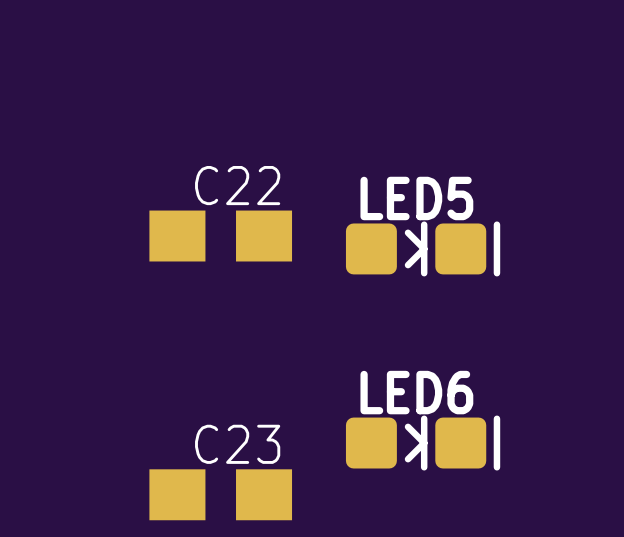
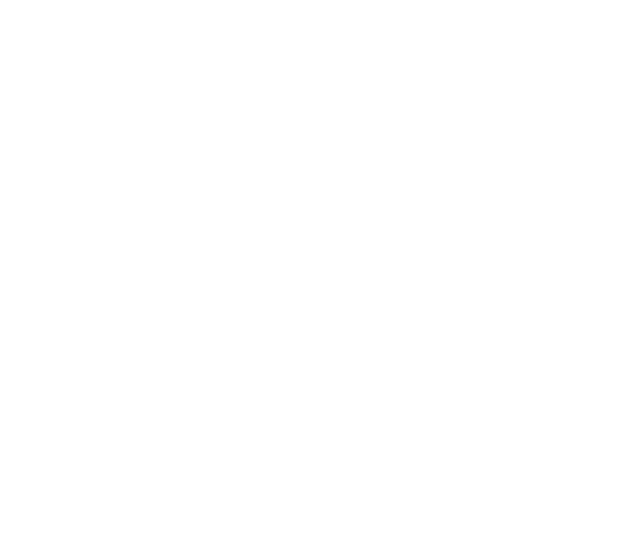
C22: (220, 236) -> none
LED5: (423, 248) -> none
LED6: (423, 443) -> none
C23: (220, 494) -> none

